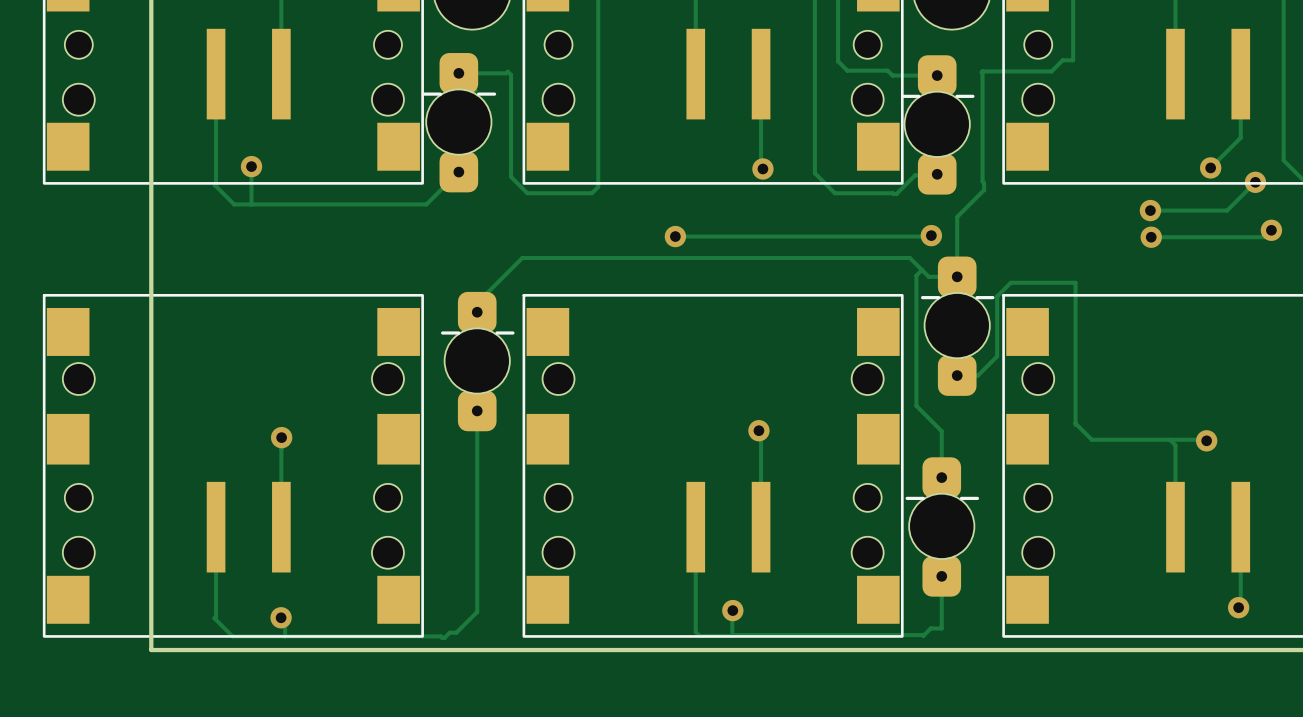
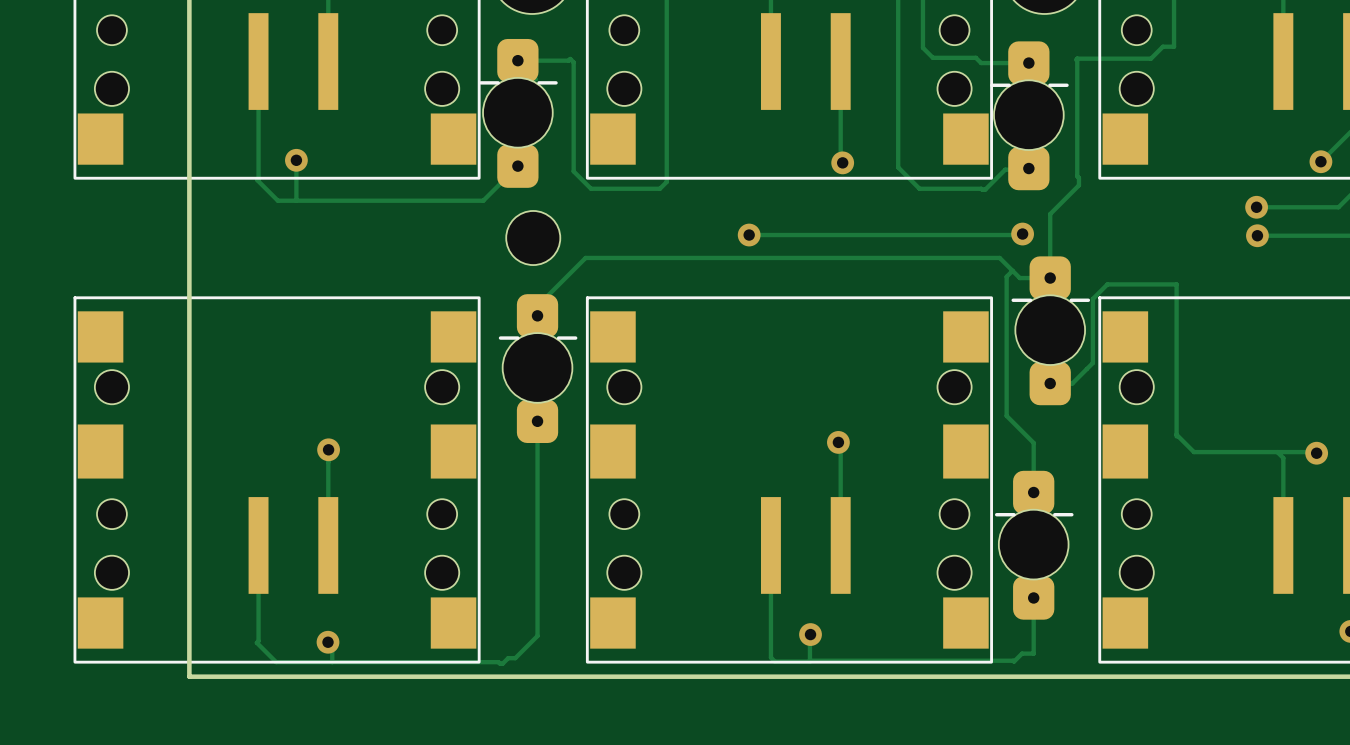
part: none -> (533, 238)

